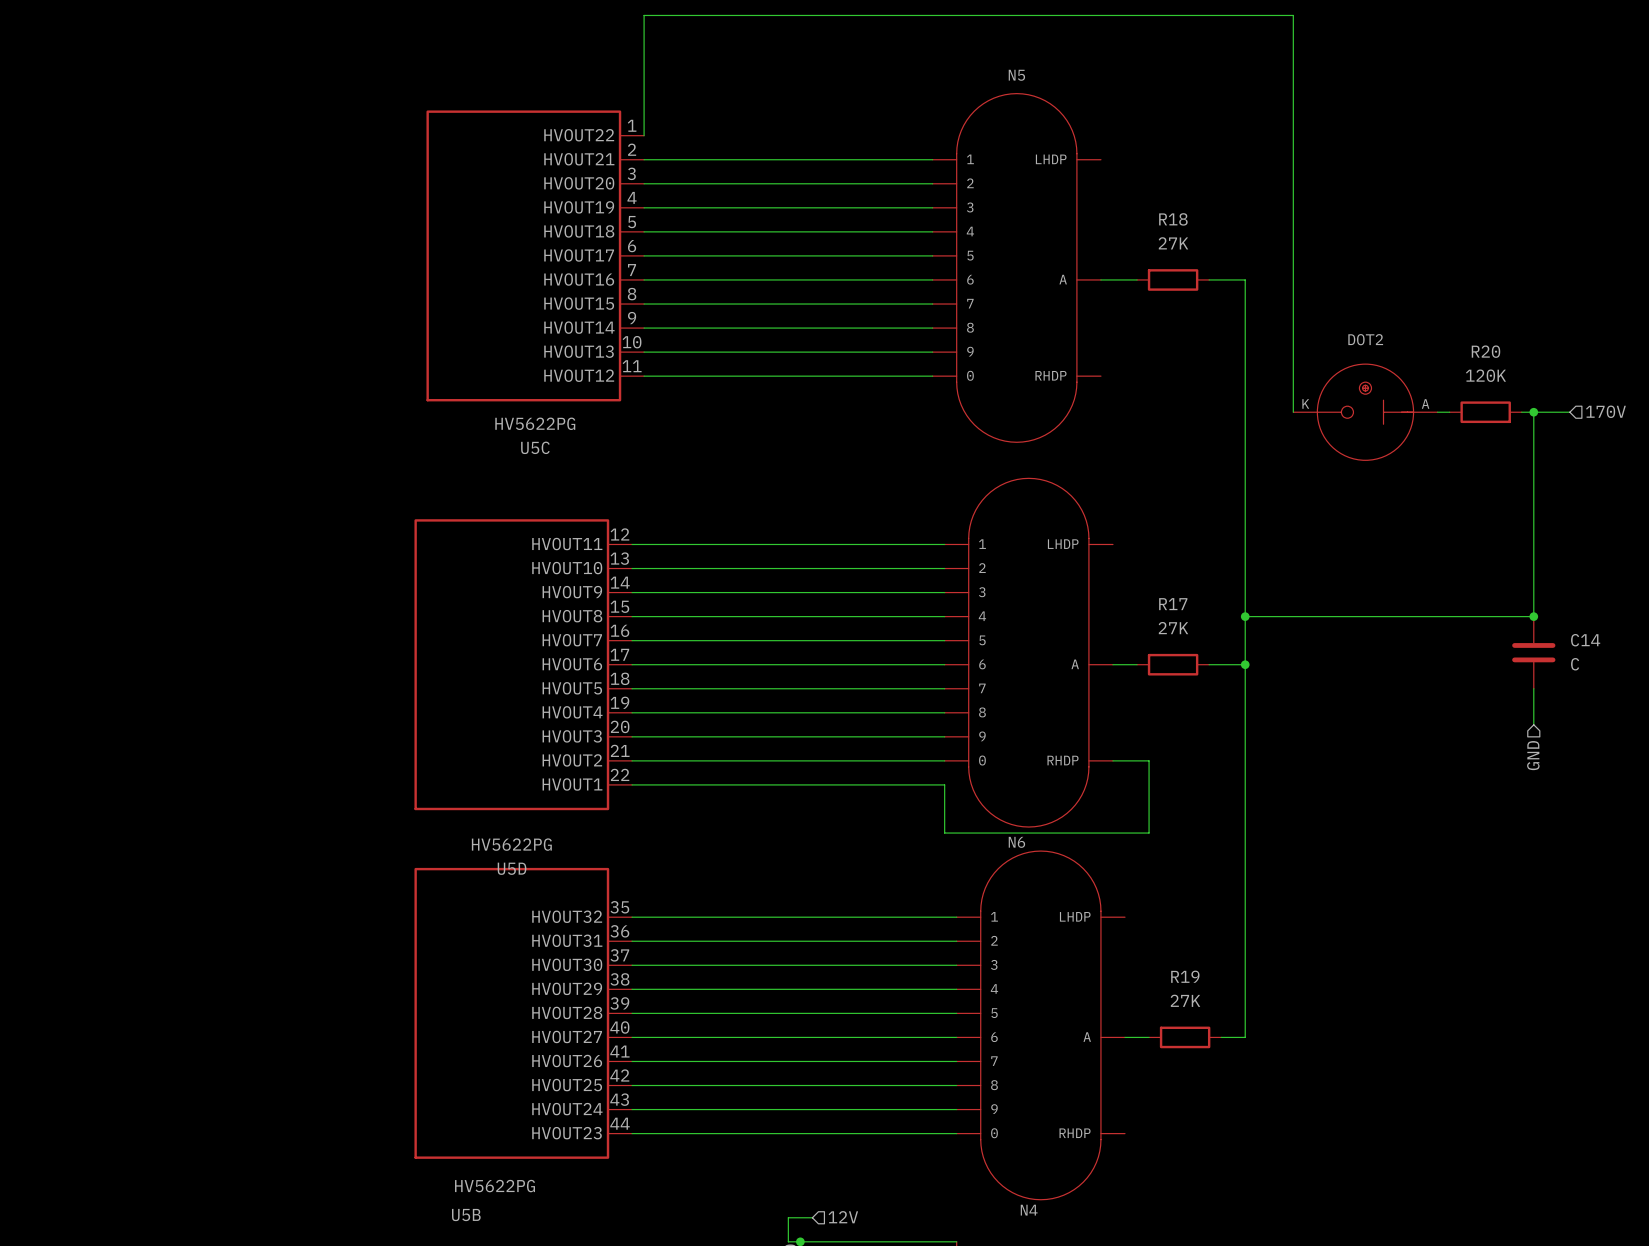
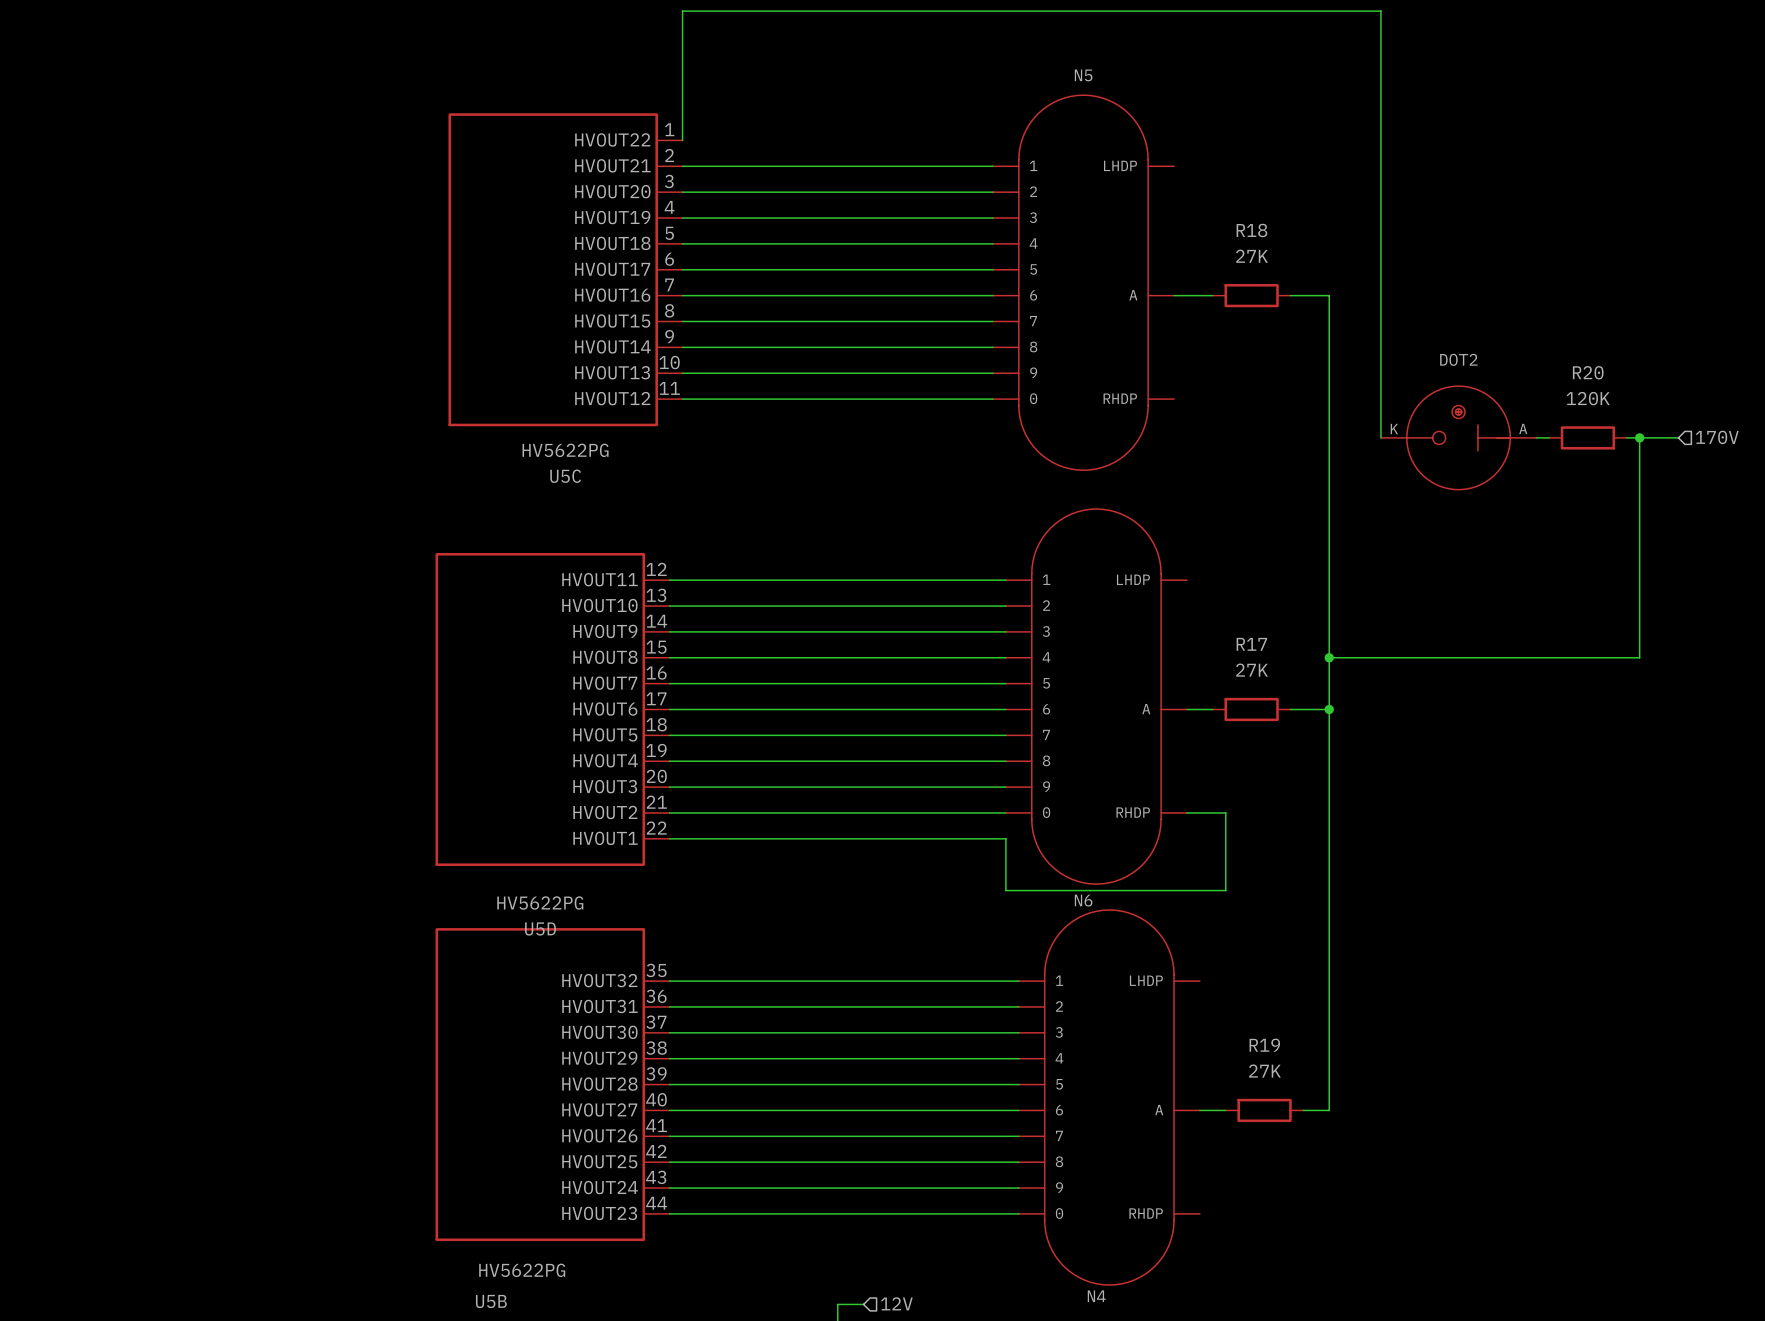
junction: (1533, 616) -> none
C14: C (1533, 652) -> none
wire: (1533, 688) (1533, 724) -> none
hierarchical label: GND (1533, 755) -> none

